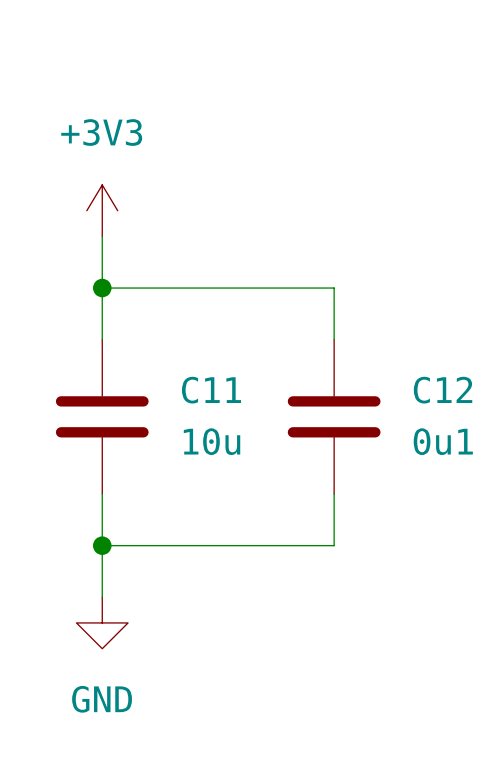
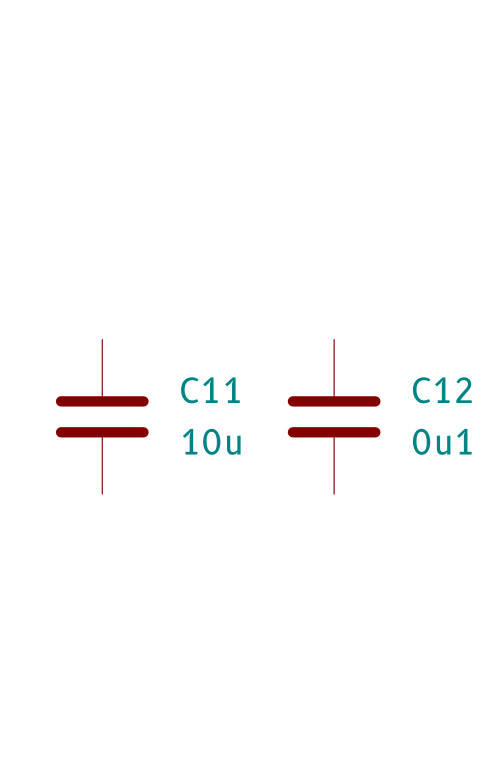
power symbol: +3V3 (102, 210) -> none
wire: (102, 236) (102, 339) -> none
wire: (102, 288) (334, 288) (334, 339) -> none
junction: (102, 288) -> none
wire: (102, 494) (102, 597) -> none
wire: (334, 494) (334, 545) (102, 545) -> none
junction: (102, 545) -> none
power symbol: GND (102, 622) -> none

